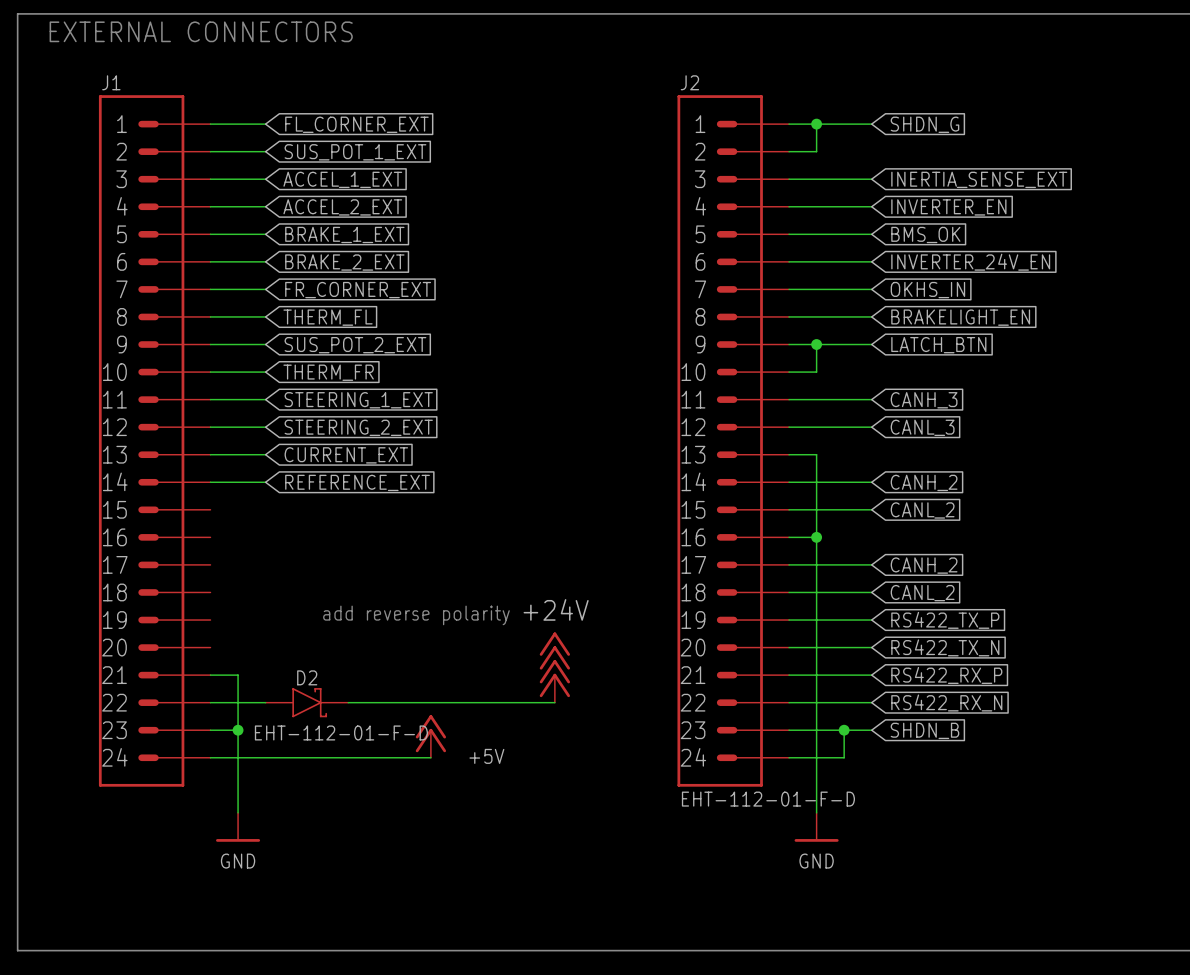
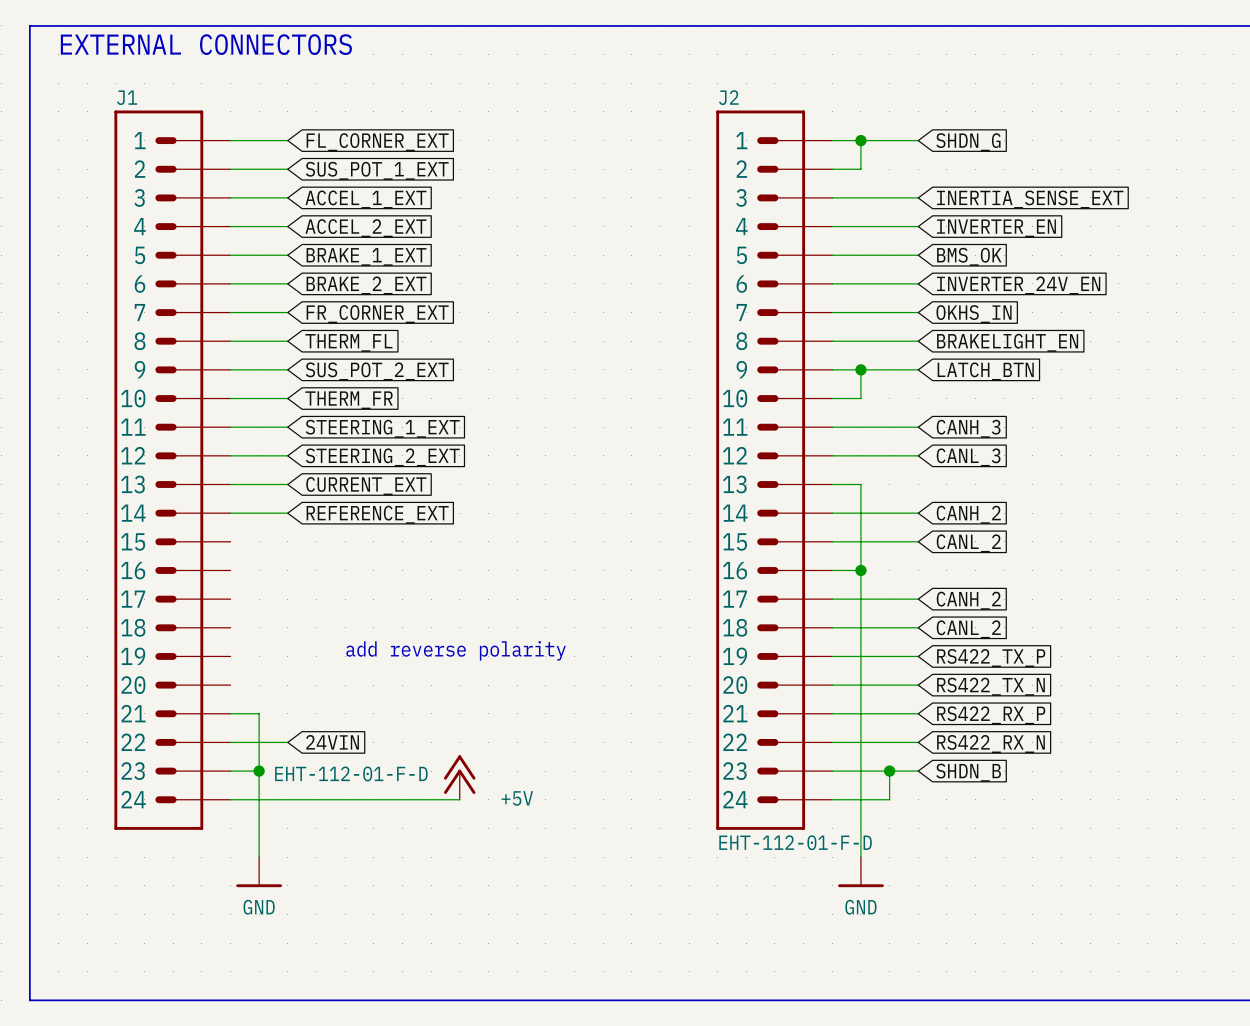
power symbol: +24V (554, 667) -> none
D2: (306, 702) -> none
global label: none -> 24VIN (332, 742)
wire: (348, 702) (554, 702) -> none

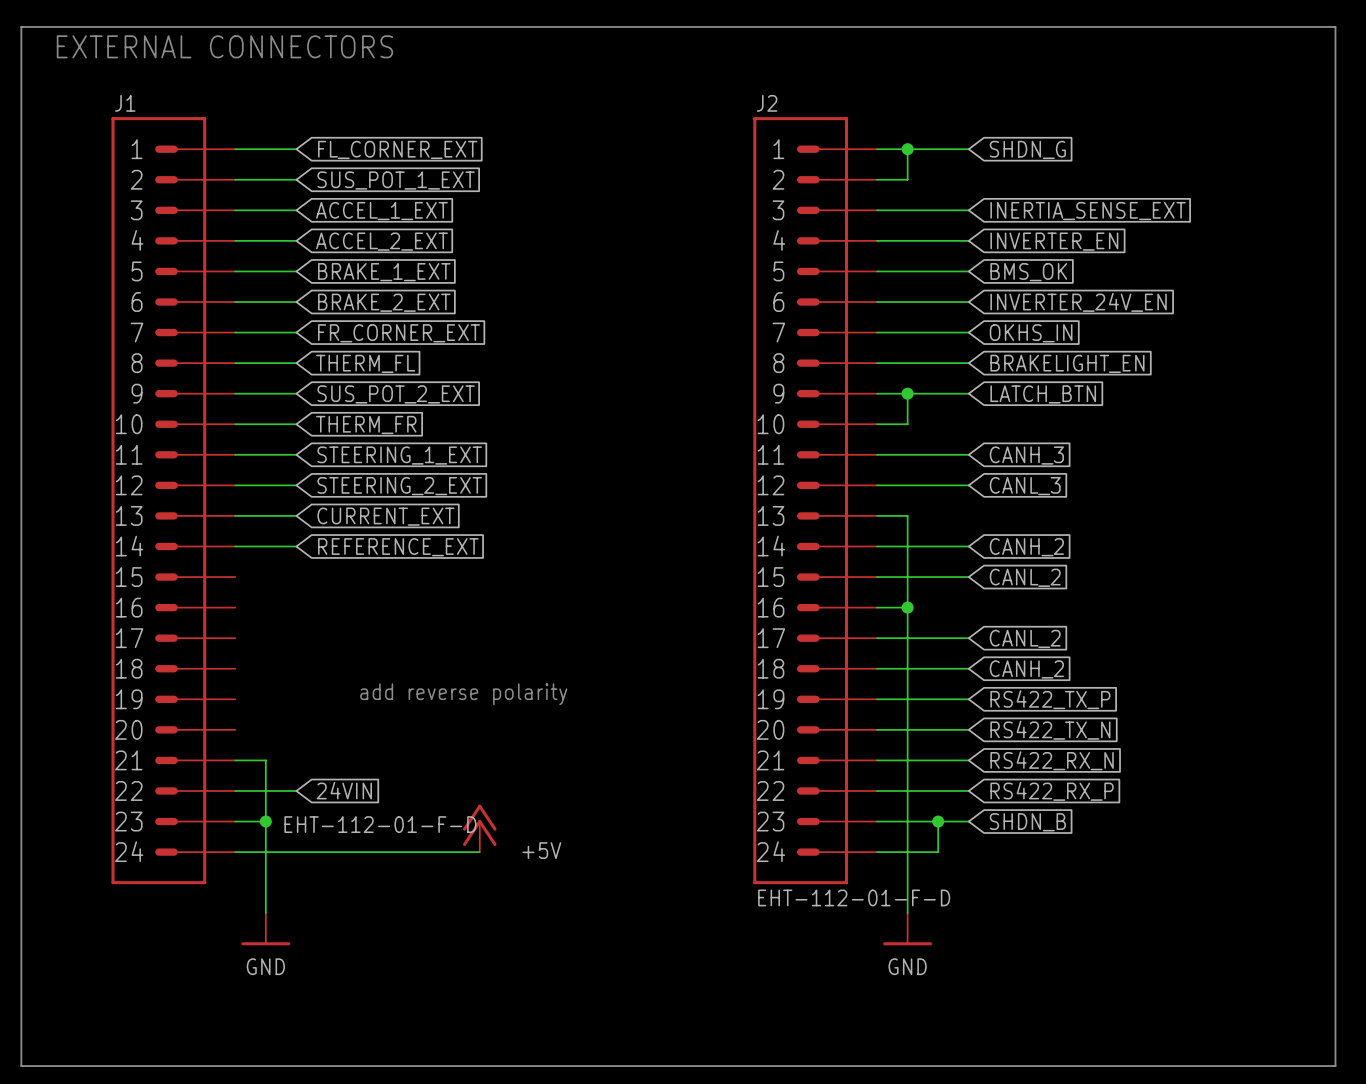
global label: CANH_2 (968, 600) -> CANL_2 (1025, 638)
global label: CANL_2 (968, 629) -> CANH_2 (1026, 669)
global label: RS422_RX_P (991, 715) -> RS422_RX_N (1052, 760)
global label: RS422_RX_N (990, 744) -> RS422_RX_P (1052, 791)

